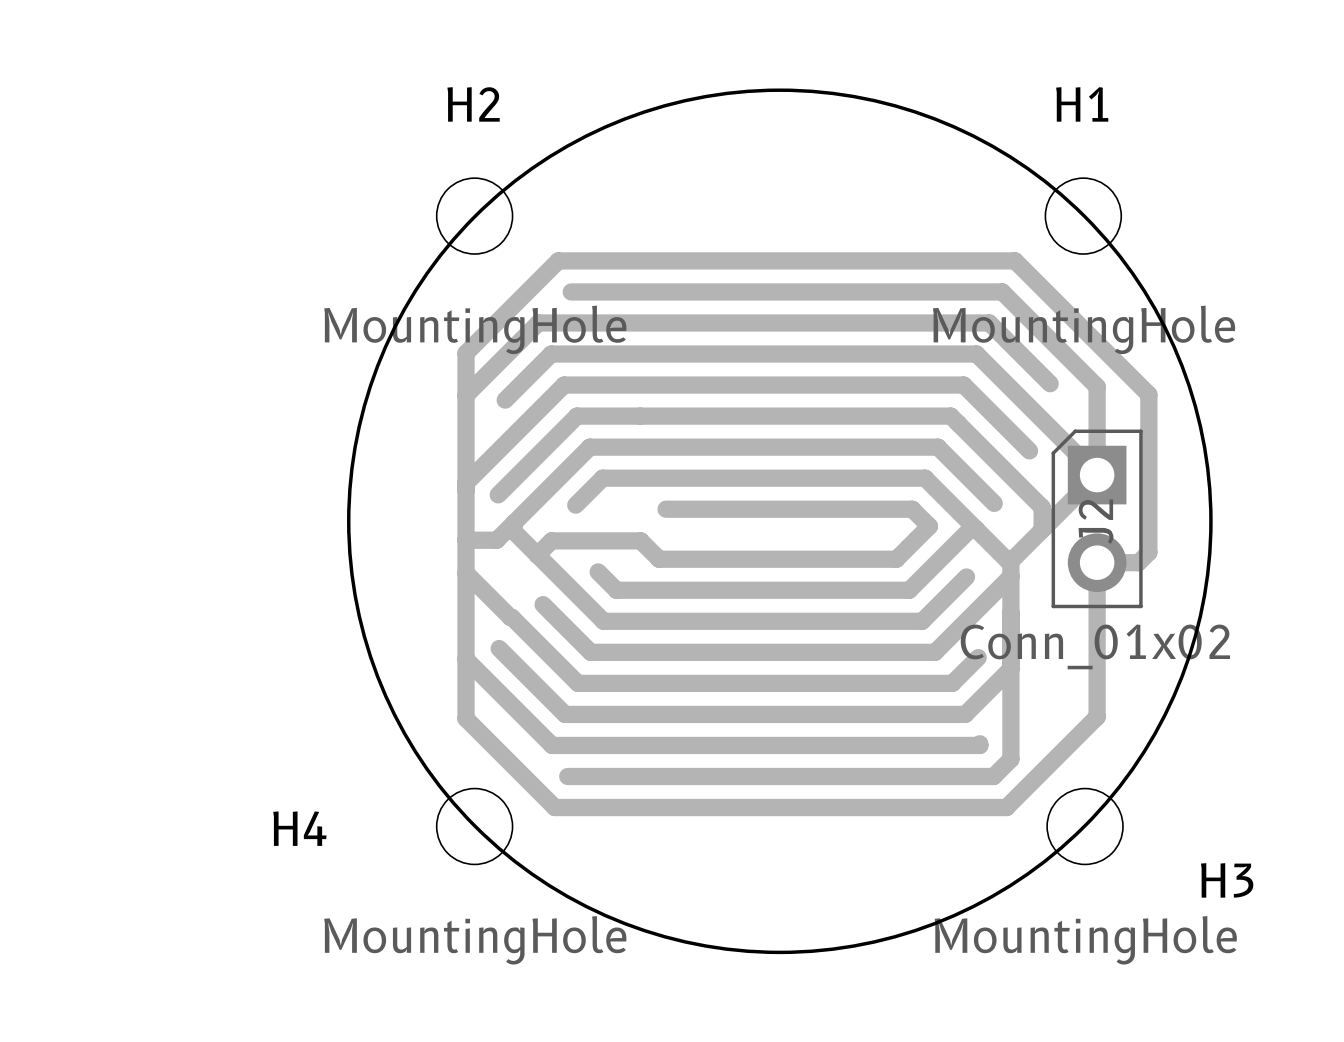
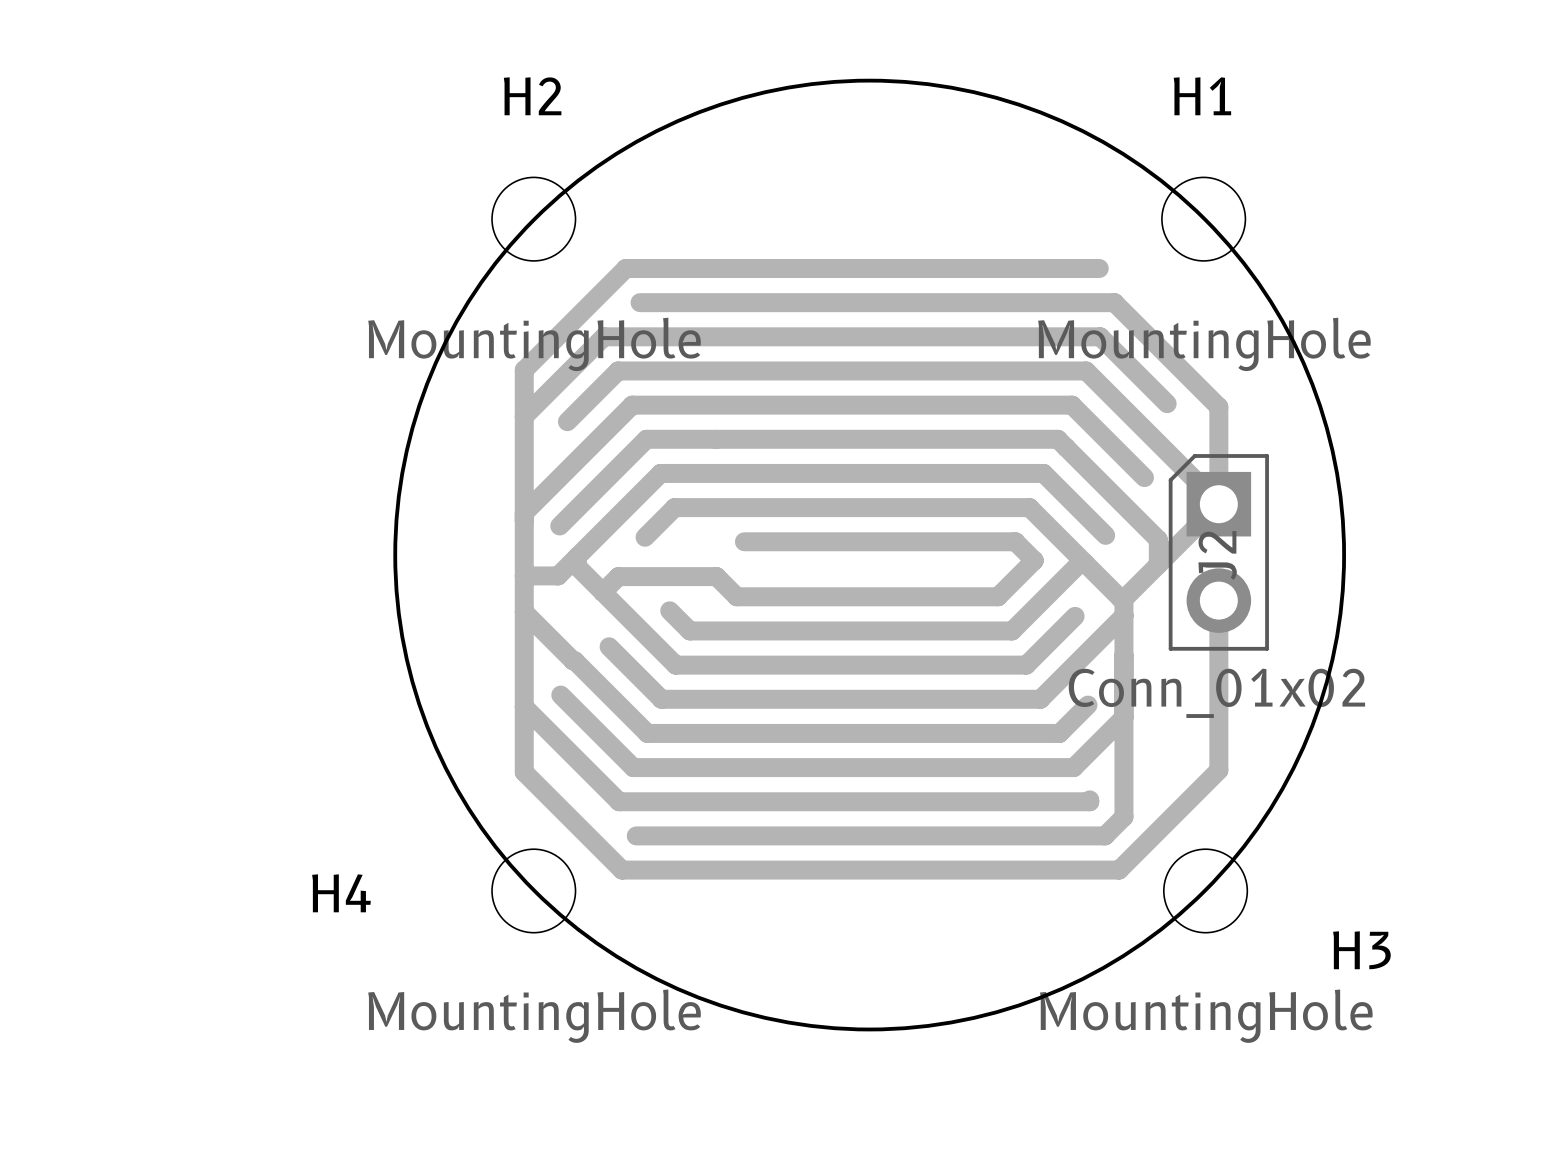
track: (988, 260) (1015, 260) (1148, 394) (1148, 552) (1138, 562) (1097, 562) -> none

